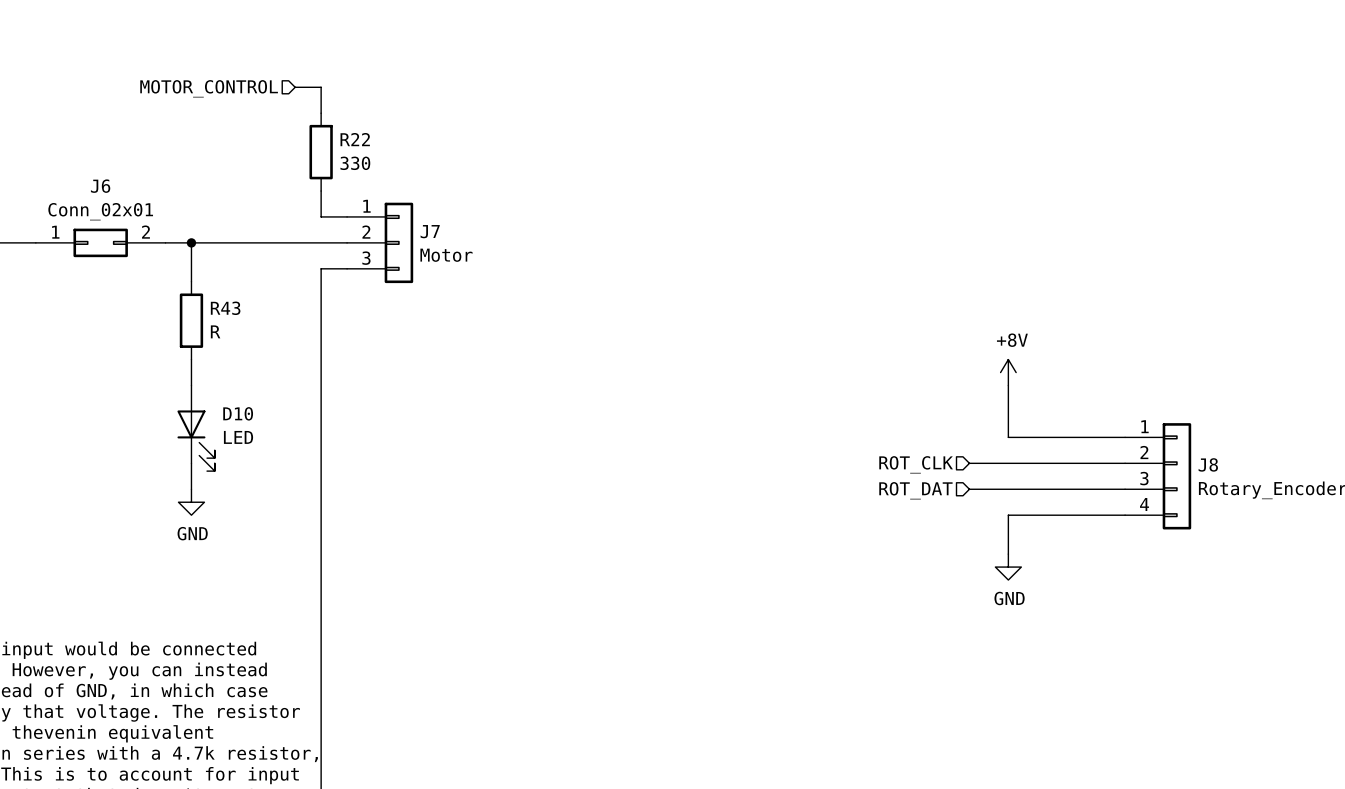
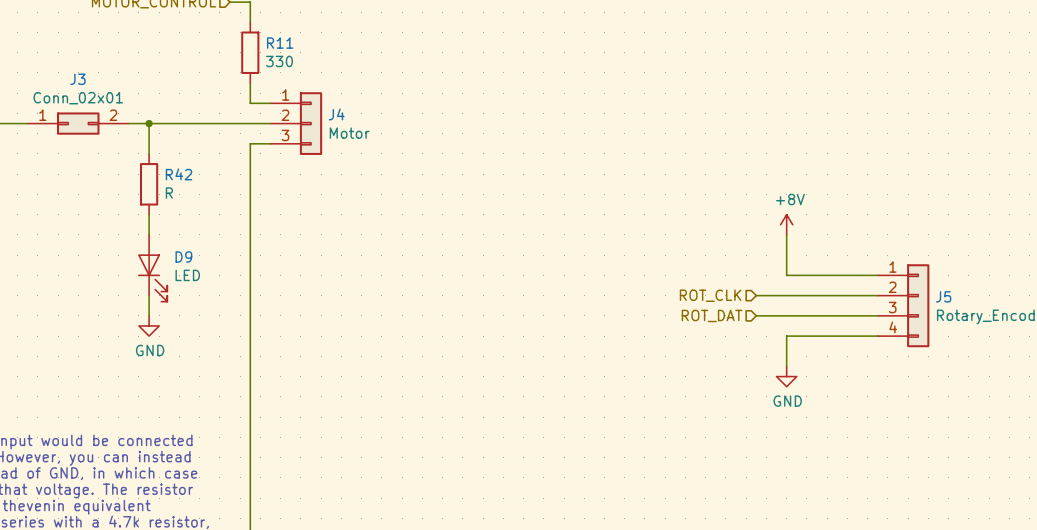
R22 name: R22 (355, 139) -> R11 (280, 43)
J6 name: J6 (100, 186) -> J3 (78, 79)
J7 name: J7 (430, 231) -> J4 (336, 114)
R43 name: R43 (225, 308) -> R42 (179, 174)
D10 name: D10 (238, 413) -> D9 (183, 256)
J8 name: J8 (1208, 464) -> J5 (943, 296)

